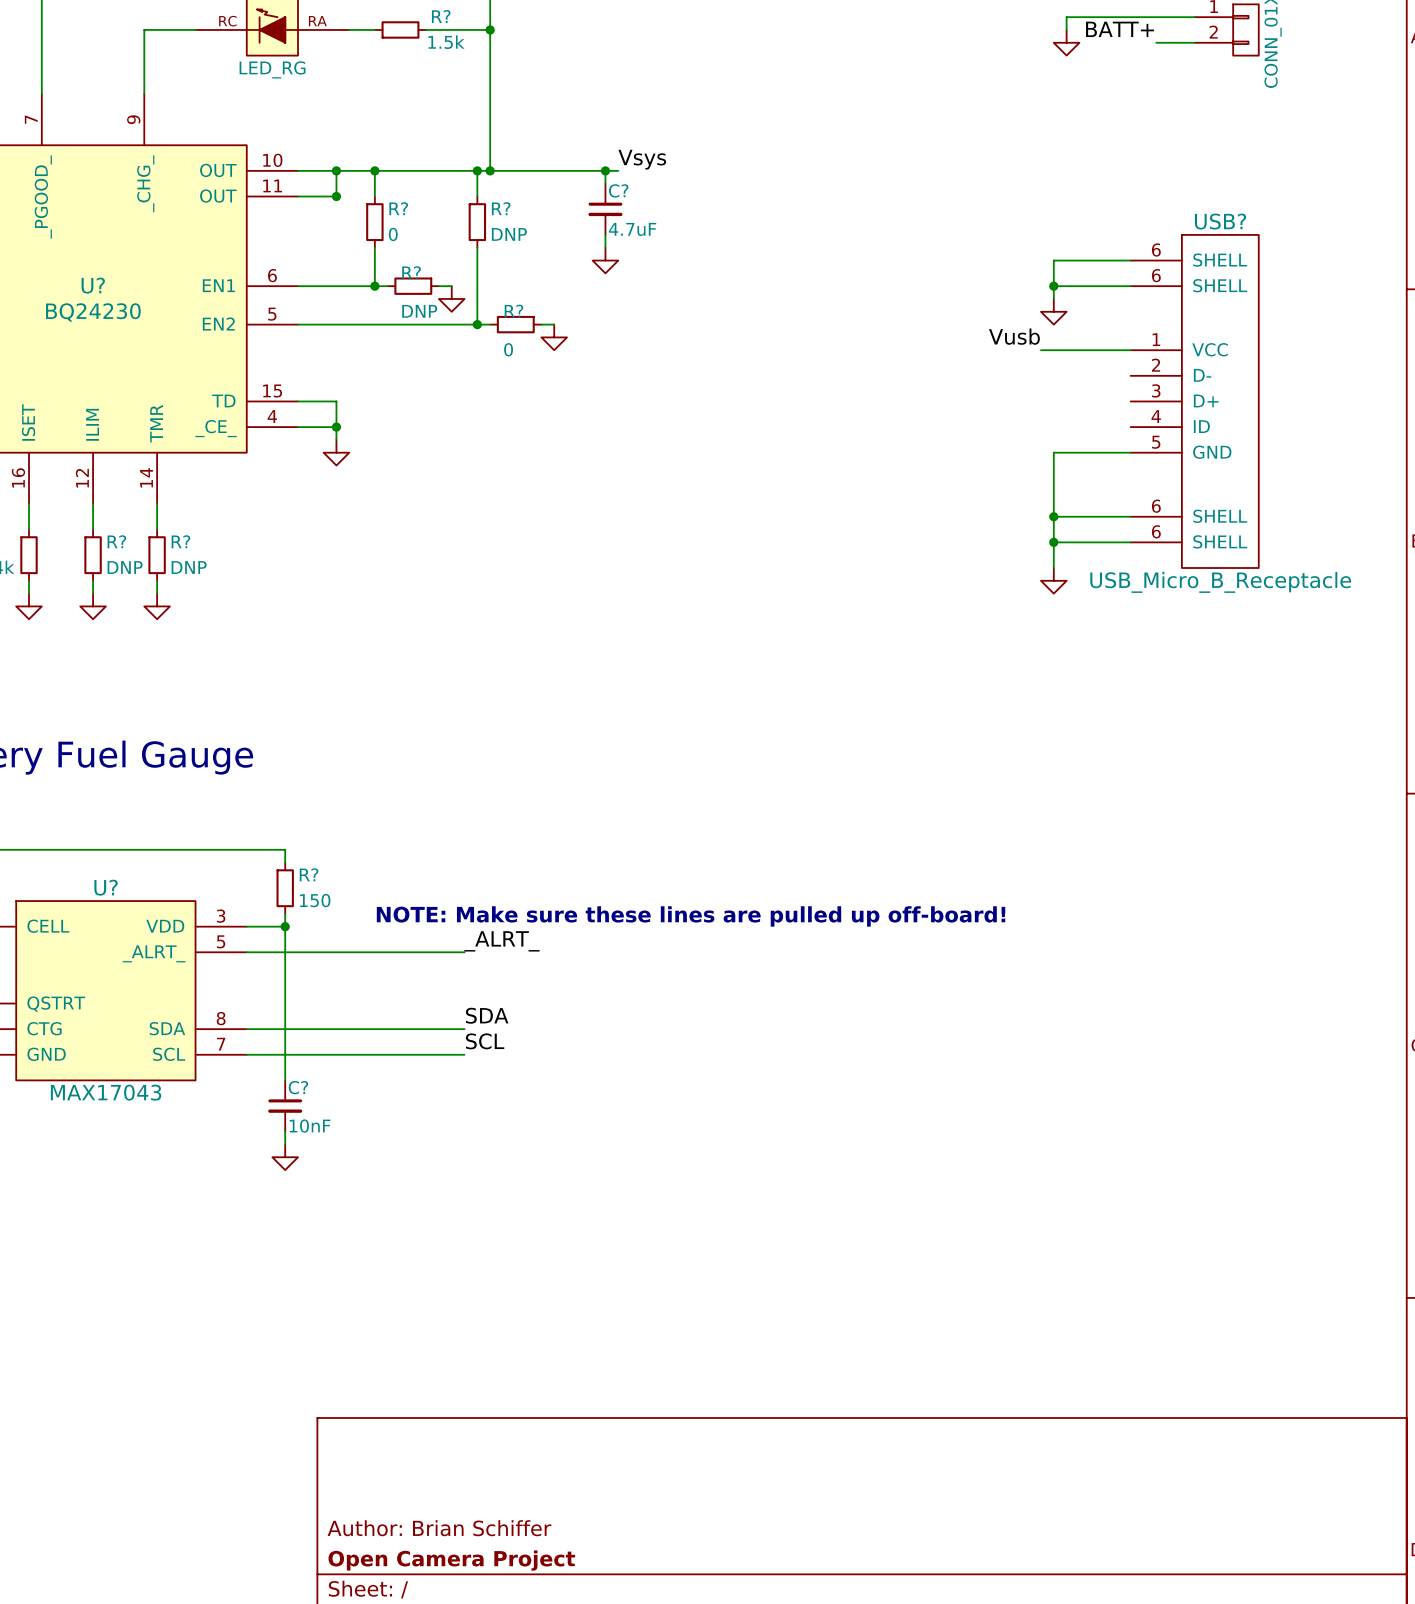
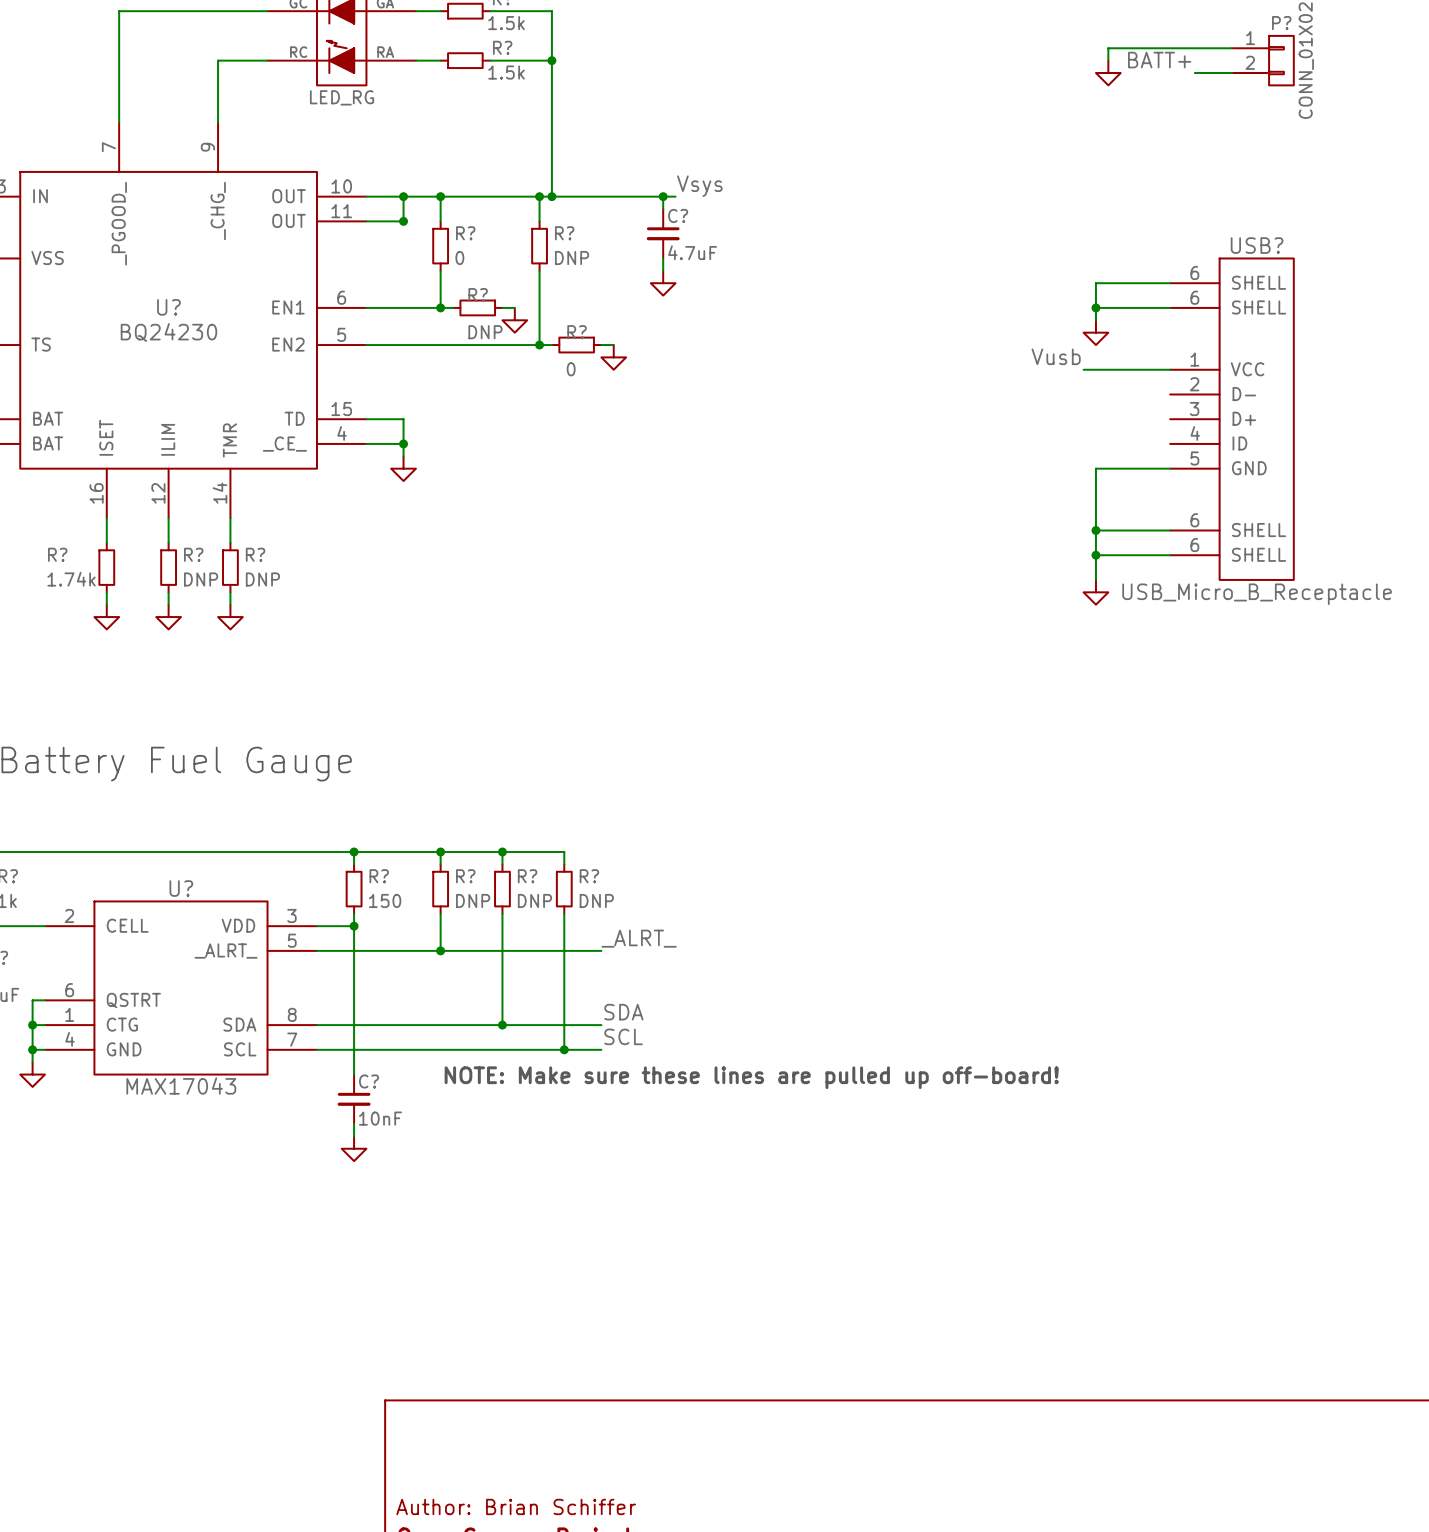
wire: none -> (354, 851) (564, 851) (564, 864)
junction: none -> (354, 851)
wire: none -> (440, 851) (440, 864)
junction: none -> (440, 851)
wire: none -> (502, 851) (502, 864)
junction: none -> (502, 851)
R?: none -> DNP (440, 889)
R?: none -> DNP (502, 889)
R?: none -> DNP (564, 889)
wire: none -> (440, 913) (440, 950)
wire: none -> (502, 913) (502, 1025)
wire: none -> (564, 913) (564, 1049)
text position: NOTE: Make sure these lines are pulled up off-board! (691, 916) -> NOTE: Make sure these lines are pulled up off-board! (751, 1077)
label position: _ALRT_ (501, 941) -> _ALRT_ (639, 938)
junction: none -> (440, 950)
wire: none -> (527, 950) (601, 950)
label position: SDA (487, 1015) -> SDA (623, 1012)
junction: none -> (502, 1025)
wire: none -> (527, 1025) (601, 1025)
label position: SCL (485, 1041) -> SCL (623, 1036)
wire: none -> (527, 1049) (601, 1049)
junction: none -> (564, 1049)

